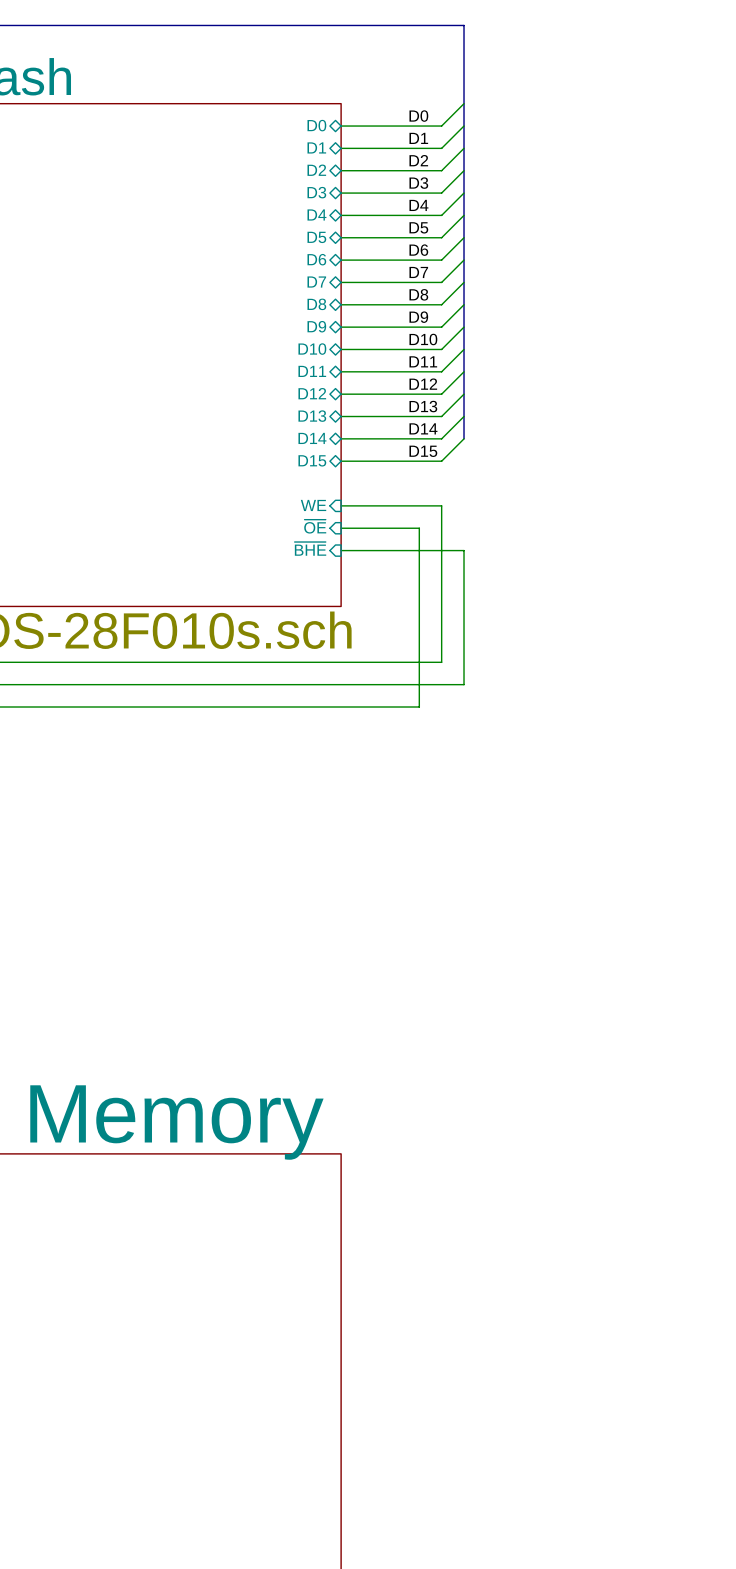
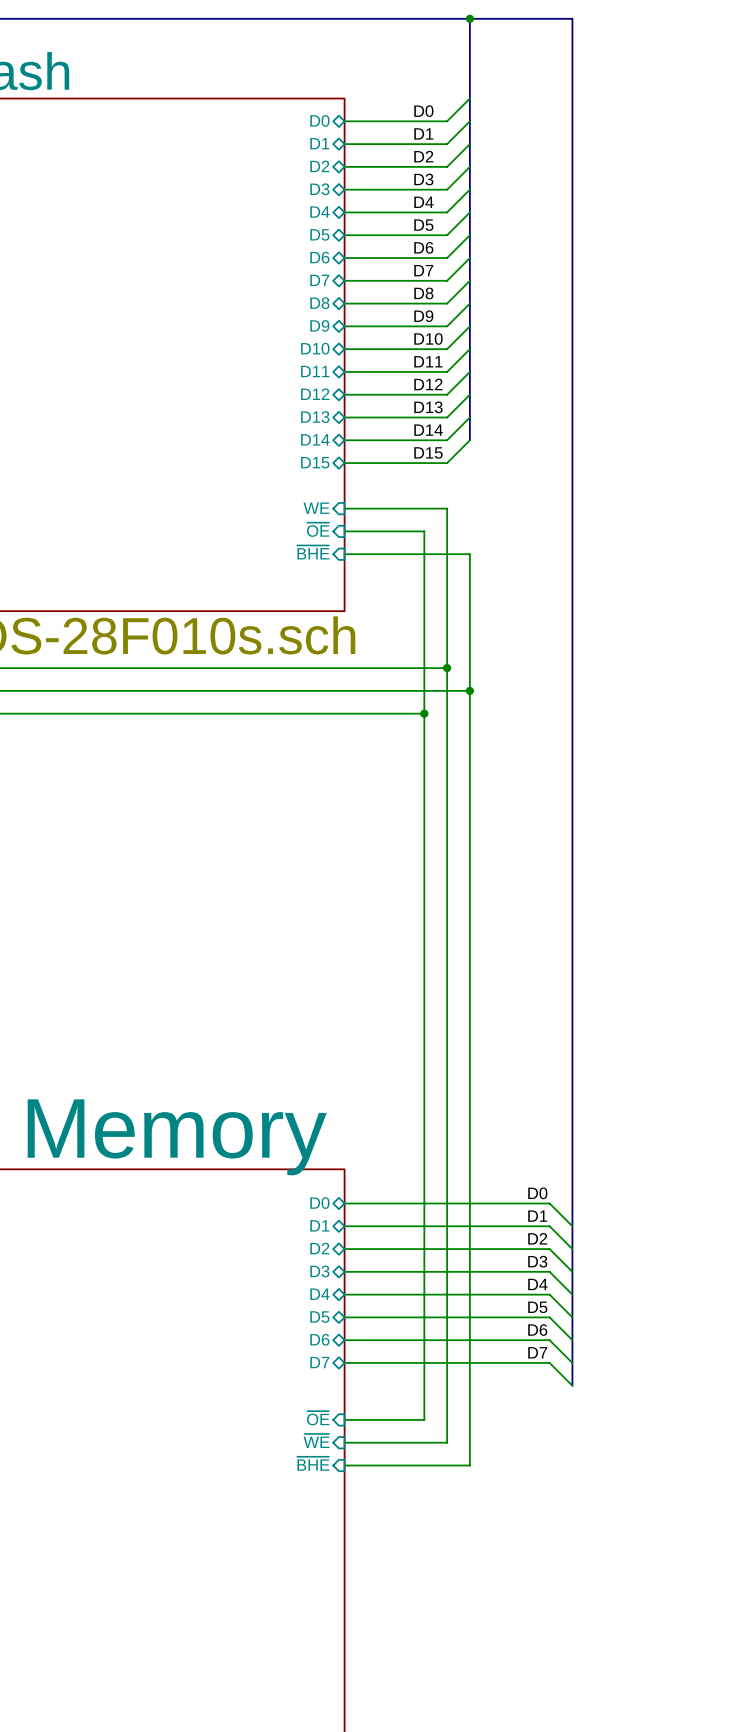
bus: none -> (469, 18) (572, 18) (572, 1385)
junction: none -> (469, 18)
wire: none -> (447, 668) (447, 1442) (344, 1442)
junction: none -> (447, 668)
wire: none -> (469, 690) (469, 1465) (344, 1465)
junction: none -> (469, 690)
wire: none -> (424, 713) (424, 1419) (344, 1419)
junction: none -> (424, 713)
label: none -> D0 (537, 1193)
sheet pin: none -> D0 (319, 1203)
wire: none -> (344, 1203) (549, 1203) (572, 1226)
label: none -> D1 (537, 1216)
sheet pin: none -> D1 (319, 1225)
wire: none -> (344, 1226) (549, 1226) (572, 1249)
label: none -> D2 (537, 1238)
sheet pin: none -> D2 (319, 1248)
wire: none -> (344, 1249) (549, 1249) (572, 1271)
label: none -> D3 (537, 1261)
sheet pin: none -> D3 (319, 1271)
wire: none -> (344, 1271) (549, 1271) (572, 1294)
label: none -> D4 (537, 1284)
sheet pin: none -> D4 (319, 1294)
wire: none -> (344, 1294) (549, 1294) (572, 1317)
label: none -> D5 (537, 1307)
sheet pin: none -> D5 (319, 1317)
wire: none -> (344, 1317) (549, 1317) (572, 1340)
label: none -> D6 (537, 1330)
sheet pin: none -> D6 (319, 1339)
wire: none -> (344, 1340) (549, 1340) (572, 1362)
label: none -> D7 (537, 1352)
sheet pin: none -> D7 (319, 1362)
wire: none -> (344, 1362) (549, 1362) (572, 1385)
sheet pin: none -> ~{OE} (318, 1418)
sheet pin: none -> ~{WE} (316, 1440)
sheet pin: none -> ~{BHE} (313, 1463)

